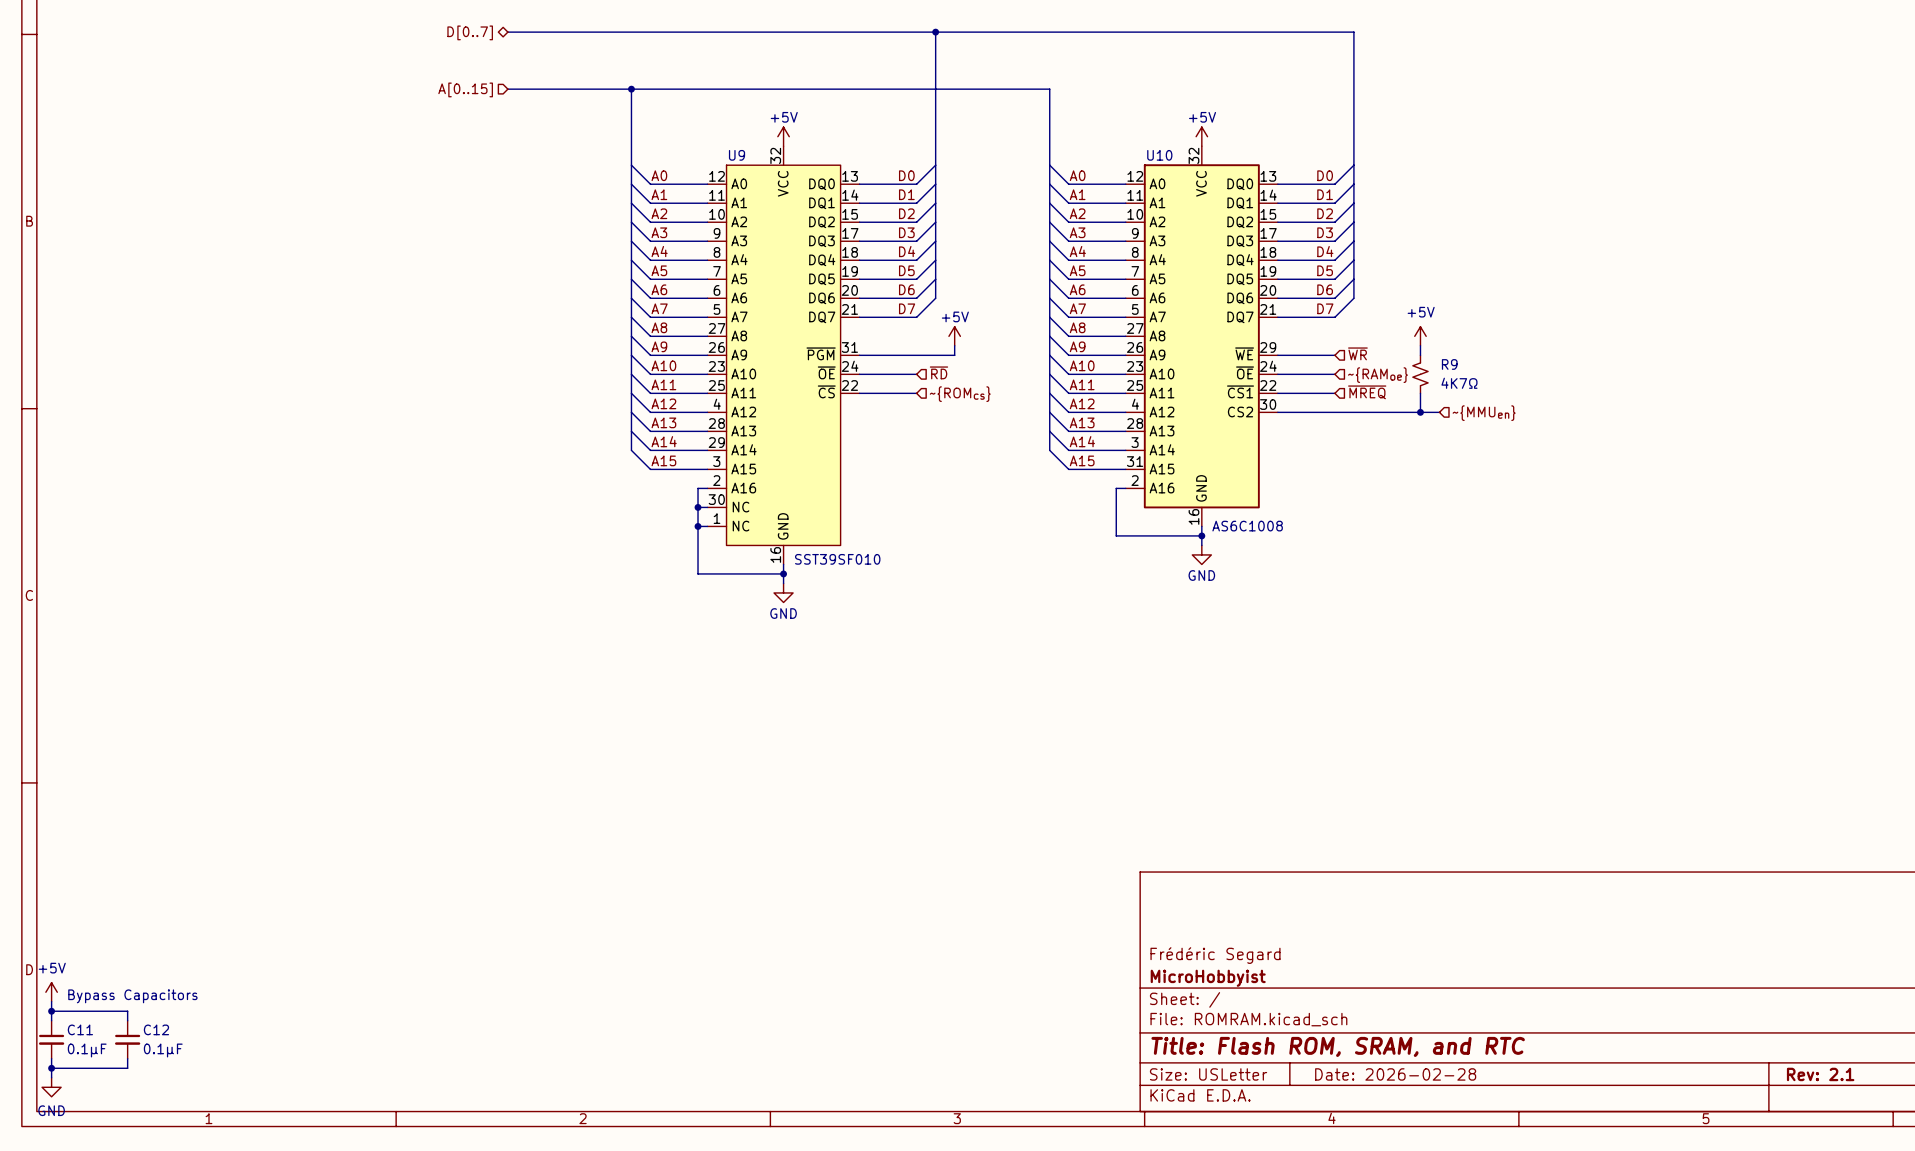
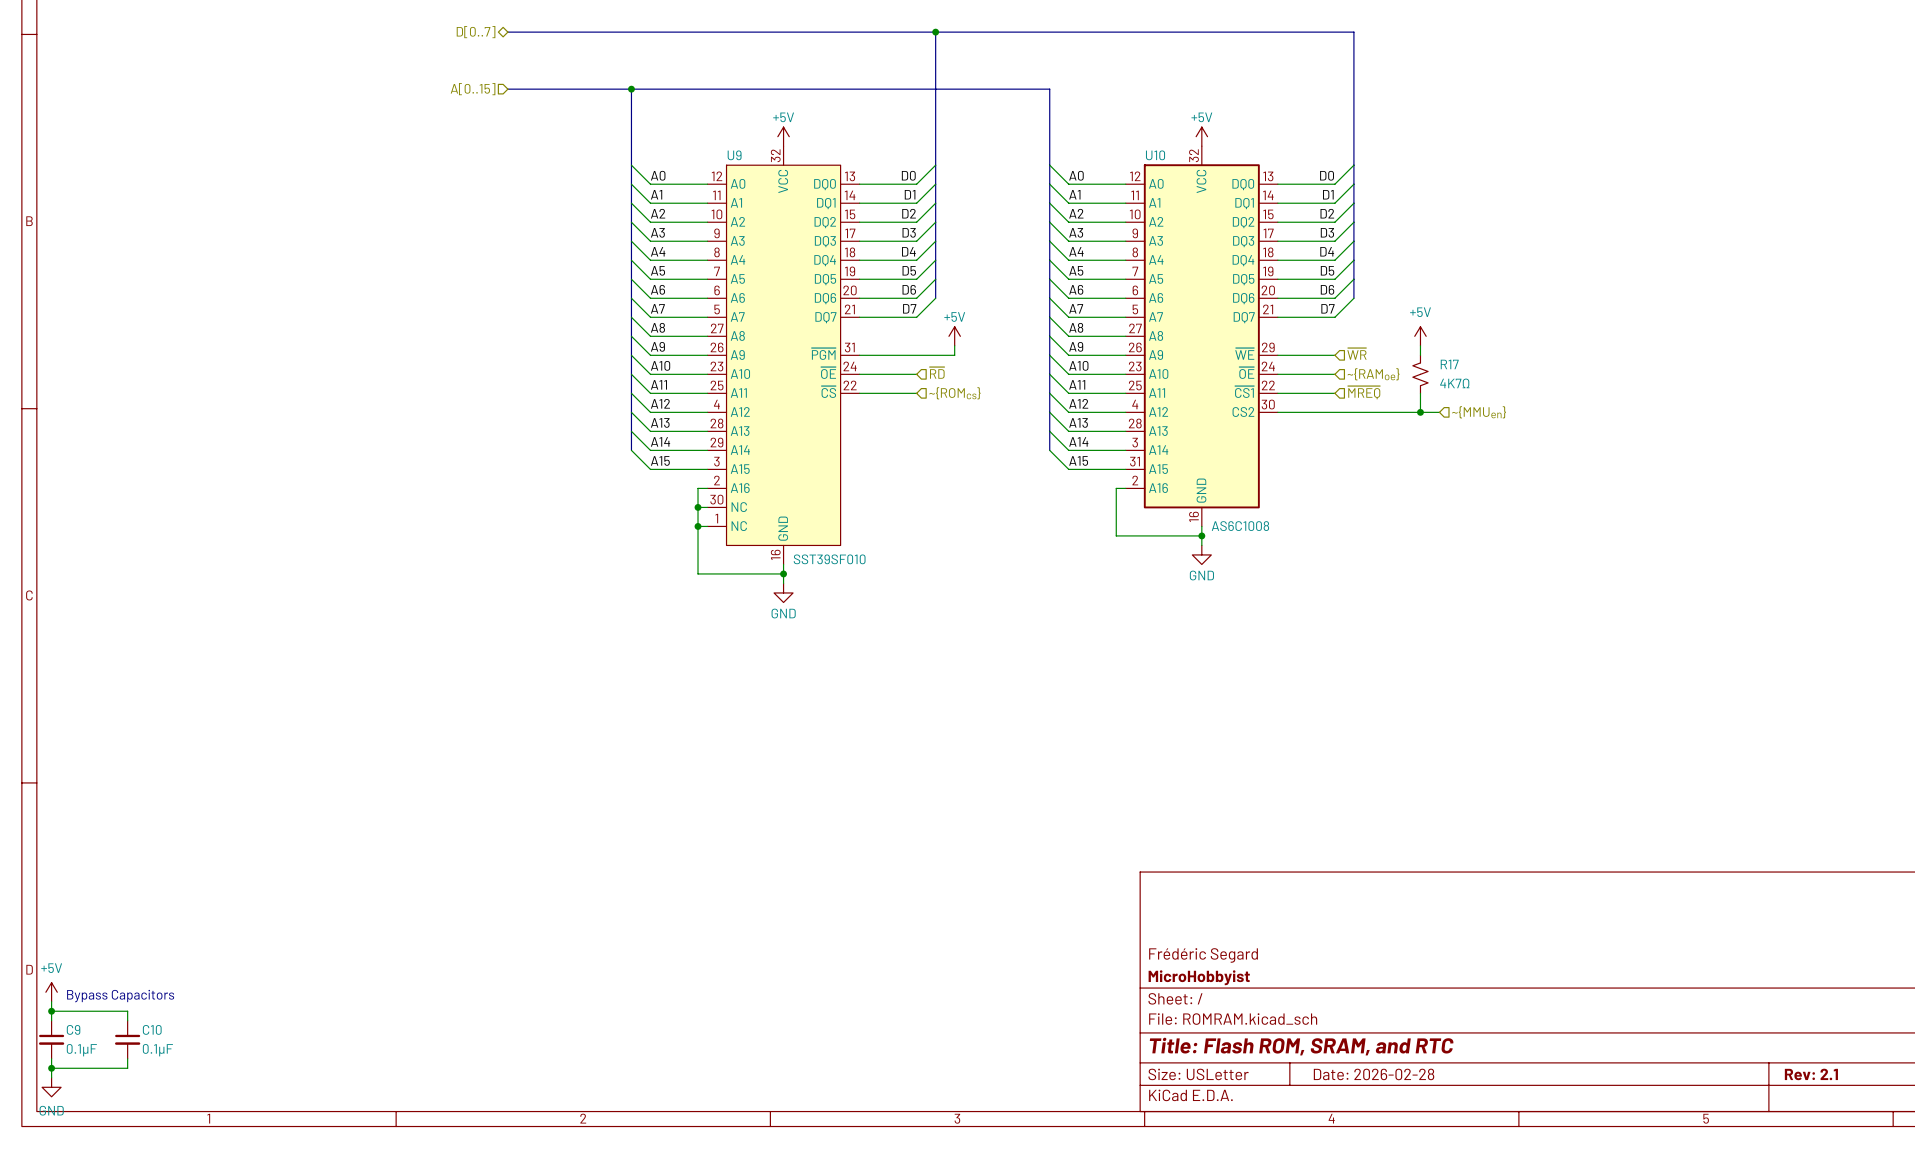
R9 name: R9 (1449, 364) -> R17 (1449, 364)
C11 name: C11 (80, 1029) -> C9 (73, 1029)
C12 name: C12 (156, 1029) -> C10 (152, 1029)

